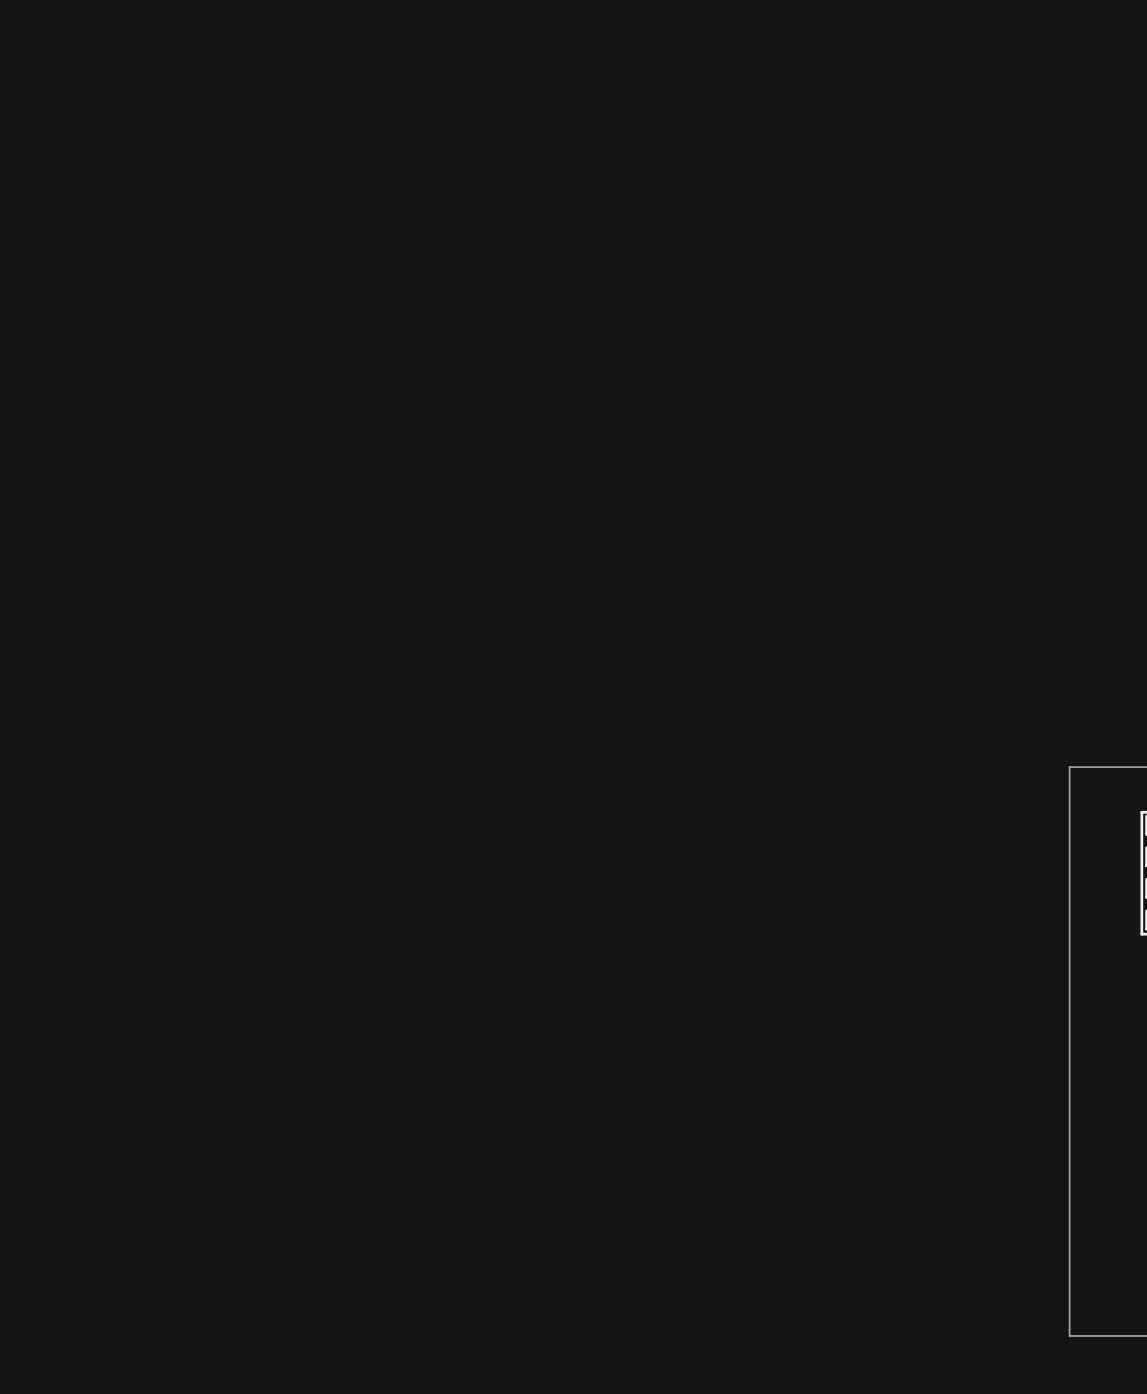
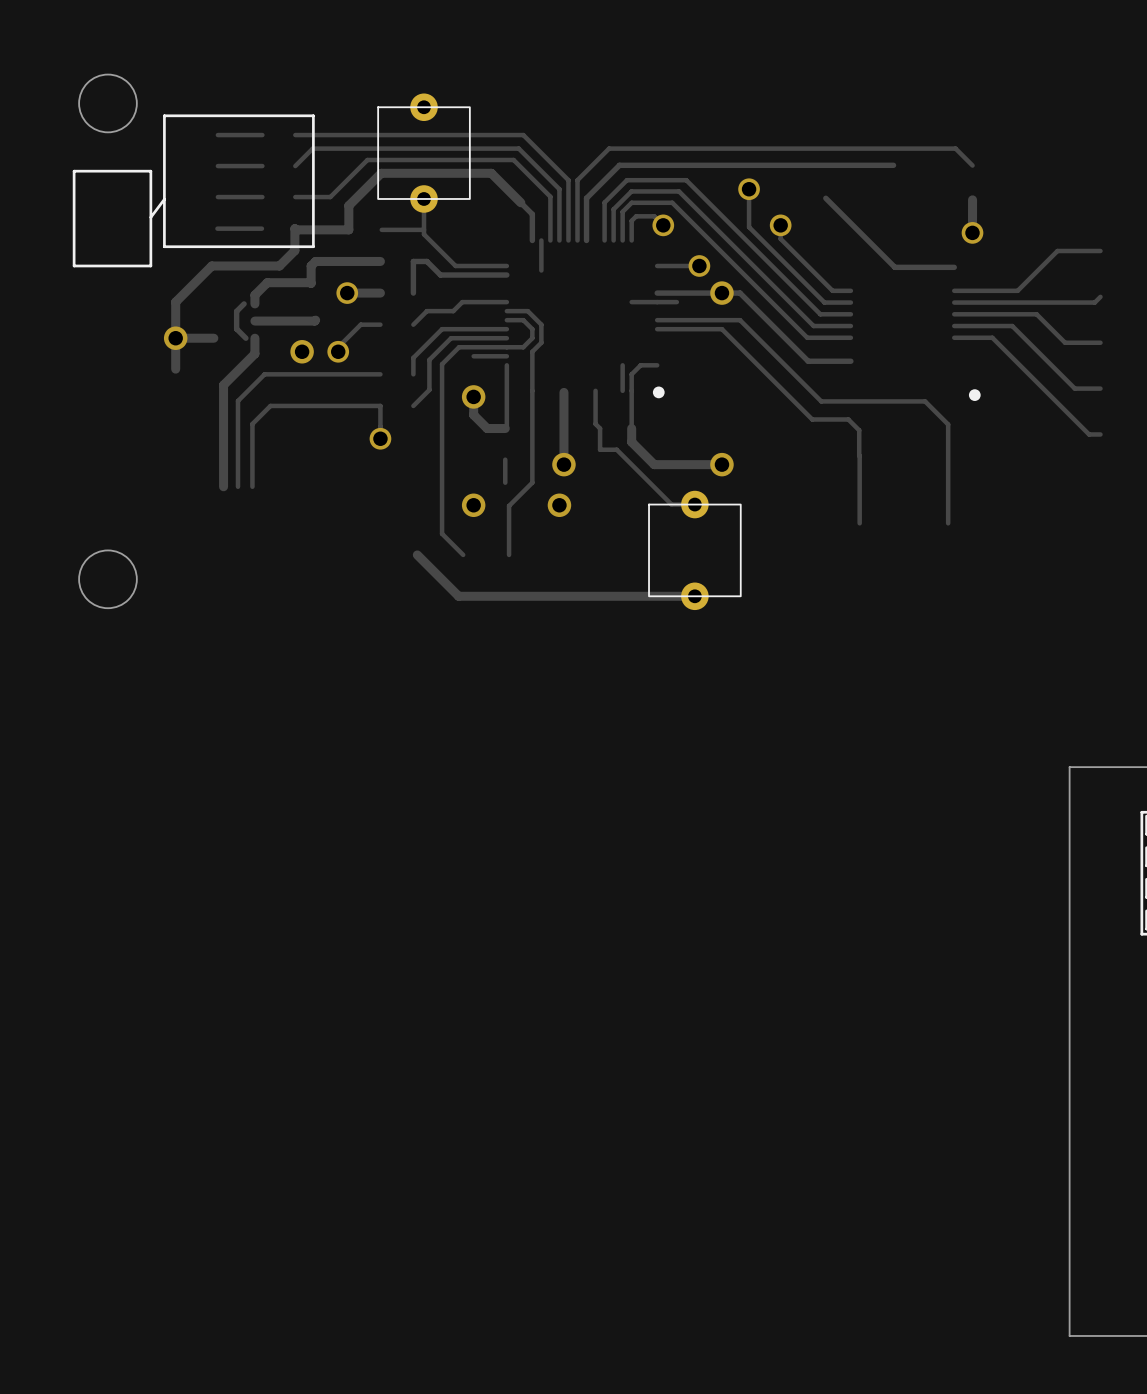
round board edge: none -> [78, 73, 138, 134]
line: none -> (164, 115) (313, 115) (313, 246) (164, 246) (164, 115)
track: none -> (217, 135) (262, 135)
track: none -> (295, 135) (523, 135) (568, 180) (568, 240)
part: none -> (424, 153)
track: none -> (893, 165) (619, 165) (586, 198) (586, 240)
track: none -> (972, 165) (955, 148) (609, 148) (577, 180) (577, 240)
track: none -> (217, 166) (262, 166)
track: none -> (295, 166) (312, 148) (518, 148) (559, 189) (559, 240)
line: none -> (74, 171) (150, 171) (150, 265) (74, 265) (74, 171)
track: none -> (749, 189) (749, 227) (824, 302) (850, 302)
via: none -> (749, 189)
track: none -> (217, 197) (262, 197)
track: none -> (295, 197) (330, 197) (367, 160) (513, 160) (550, 196) (550, 240)
track: none -> (424, 198) (424, 234) (455, 265) (506, 265)
track: none -> (825, 198) (894, 267) (954, 267)
line: none -> (164, 199) (150, 217)
track: none -> (972, 199) (972, 232)
track: none -> (663, 225) (654, 216) (636, 216) (631, 220) (631, 240)
via: none -> (663, 225)
track: none -> (780, 225) (780, 238) (832, 290) (850, 290)
via: none -> (780, 225)
track: none -> (217, 228) (261, 228)
track: none -> (381, 229) (424, 229)
via: none -> (972, 232)
track: none -> (532, 240) (532, 214) (491, 173) (381, 173) (348, 205) (348, 229) (294, 228) (294, 250) (279, 265) (211, 265) (175, 302) (175, 369)
track: none -> (541, 240) (541, 270)
track: none -> (604, 240) (604, 202) (626, 180) (686, 180) (820, 314) (850, 314)
track: none -> (613, 240) (613, 209) (631, 191) (679, 191) (813, 326) (850, 326)
track: none -> (622, 240) (622, 211) (631, 202) (672, 202) (807, 337) (850, 337)
track: none -> (1100, 251) (1057, 251) (1017, 290) (954, 290)
track: none -> (380, 261) (315, 261) (311, 265) (311, 283) (267, 282) (254, 295) (254, 303)
track: none -> (657, 265) (699, 265)
via: none -> (699, 265)
track: none -> (506, 275) (440, 275) (426, 261) (413, 261) (413, 293)
via: none -> (347, 293)
track: none -> (351, 293) (380, 293)
track: none -> (657, 293) (740, 293) (808, 361) (850, 361)
via: none -> (721, 293)
track: none -> (1100, 296) (1094, 302) (954, 302)
track: none -> (506, 302) (462, 302) (453, 311) (426, 311) (413, 324)
track: none -> (631, 302) (676, 302)
track: none -> (244, 303) (236, 311) (236, 328) (245, 338)
track: none -> (506, 311) (527, 311) (541, 324) (541, 342) (532, 351) (532, 482) (509, 505) (509, 554)
track: none -> (954, 314) (1036, 314) (1065, 342) (1100, 342)
track: none -> (315, 320) (254, 321)
track: none -> (506, 320) (523, 320) (532, 329) (532, 338) (523, 347) (459, 347) (442, 364) (442, 533) (463, 554)
track: none -> (657, 320) (740, 320) (821, 401) (925, 401) (948, 424) (948, 523)
track: none -> (380, 324) (360, 324) (338, 347) (338, 351)
track: none -> (954, 326) (1012, 326) (1074, 388) (1100, 388)
track: none -> (506, 329) (442, 329) (413, 357) (413, 374)
track: none -> (657, 329) (721, 329) (812, 419) (848, 419) (859, 430) (859, 523)
track: none -> (954, 337) (992, 337) (1089, 434) (1100, 434)
track: none -> (175, 338) (213, 338)
via: none -> (175, 338)
track: none -> (254, 338) (254, 353) (223, 385) (223, 486)
track: none -> (506, 338) (451, 338) (429, 359) (429, 389) (413, 405)
via: none -> (302, 351)
via: none -> (338, 351)
track: none -> (473, 356) (506, 356)
track: none -> (506, 365) (506, 426) (505, 428) (487, 428) (473, 414) (473, 396)
track: none -> (622, 365) (622, 390)
track: none -> (657, 365) (640, 365) (631, 374) (631, 442) (654, 464) (721, 464)
track: none -> (380, 374) (264, 374) (238, 400) (238, 486)
drawing: none -> [652, 386, 665, 399]
drawing: none -> [968, 389, 981, 401]
track: none -> (595, 390) (595, 424) (600, 428) (600, 449) (616, 449) (671, 504) (694, 504)
track: none -> (563, 392) (563, 464)
via: none -> (473, 396)
track: none -> (380, 438) (380, 405) (270, 405) (252, 424) (252, 486)
via: none -> (380, 438)
track: none -> (505, 459) (505, 482)
via: none -> (563, 464)
via: none -> (721, 464)
via: none -> (473, 505)
via: none -> (559, 505)
round board edge: none -> [78, 549, 138, 610]
part: none -> (694, 550)
track: none -> (417, 554) (458, 596) (694, 596)

